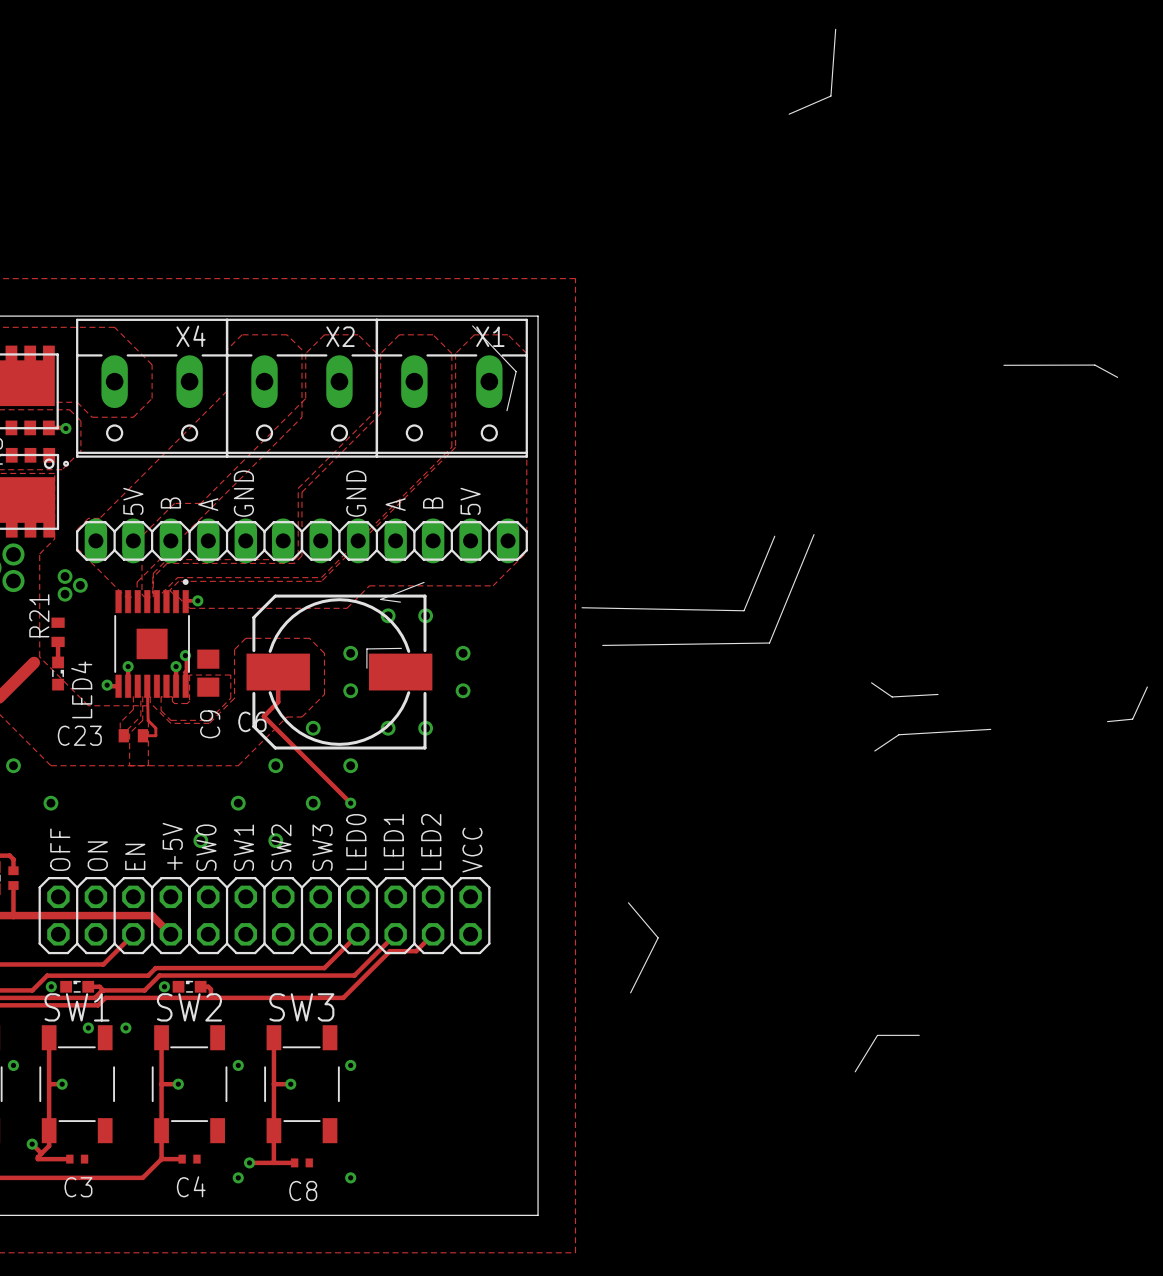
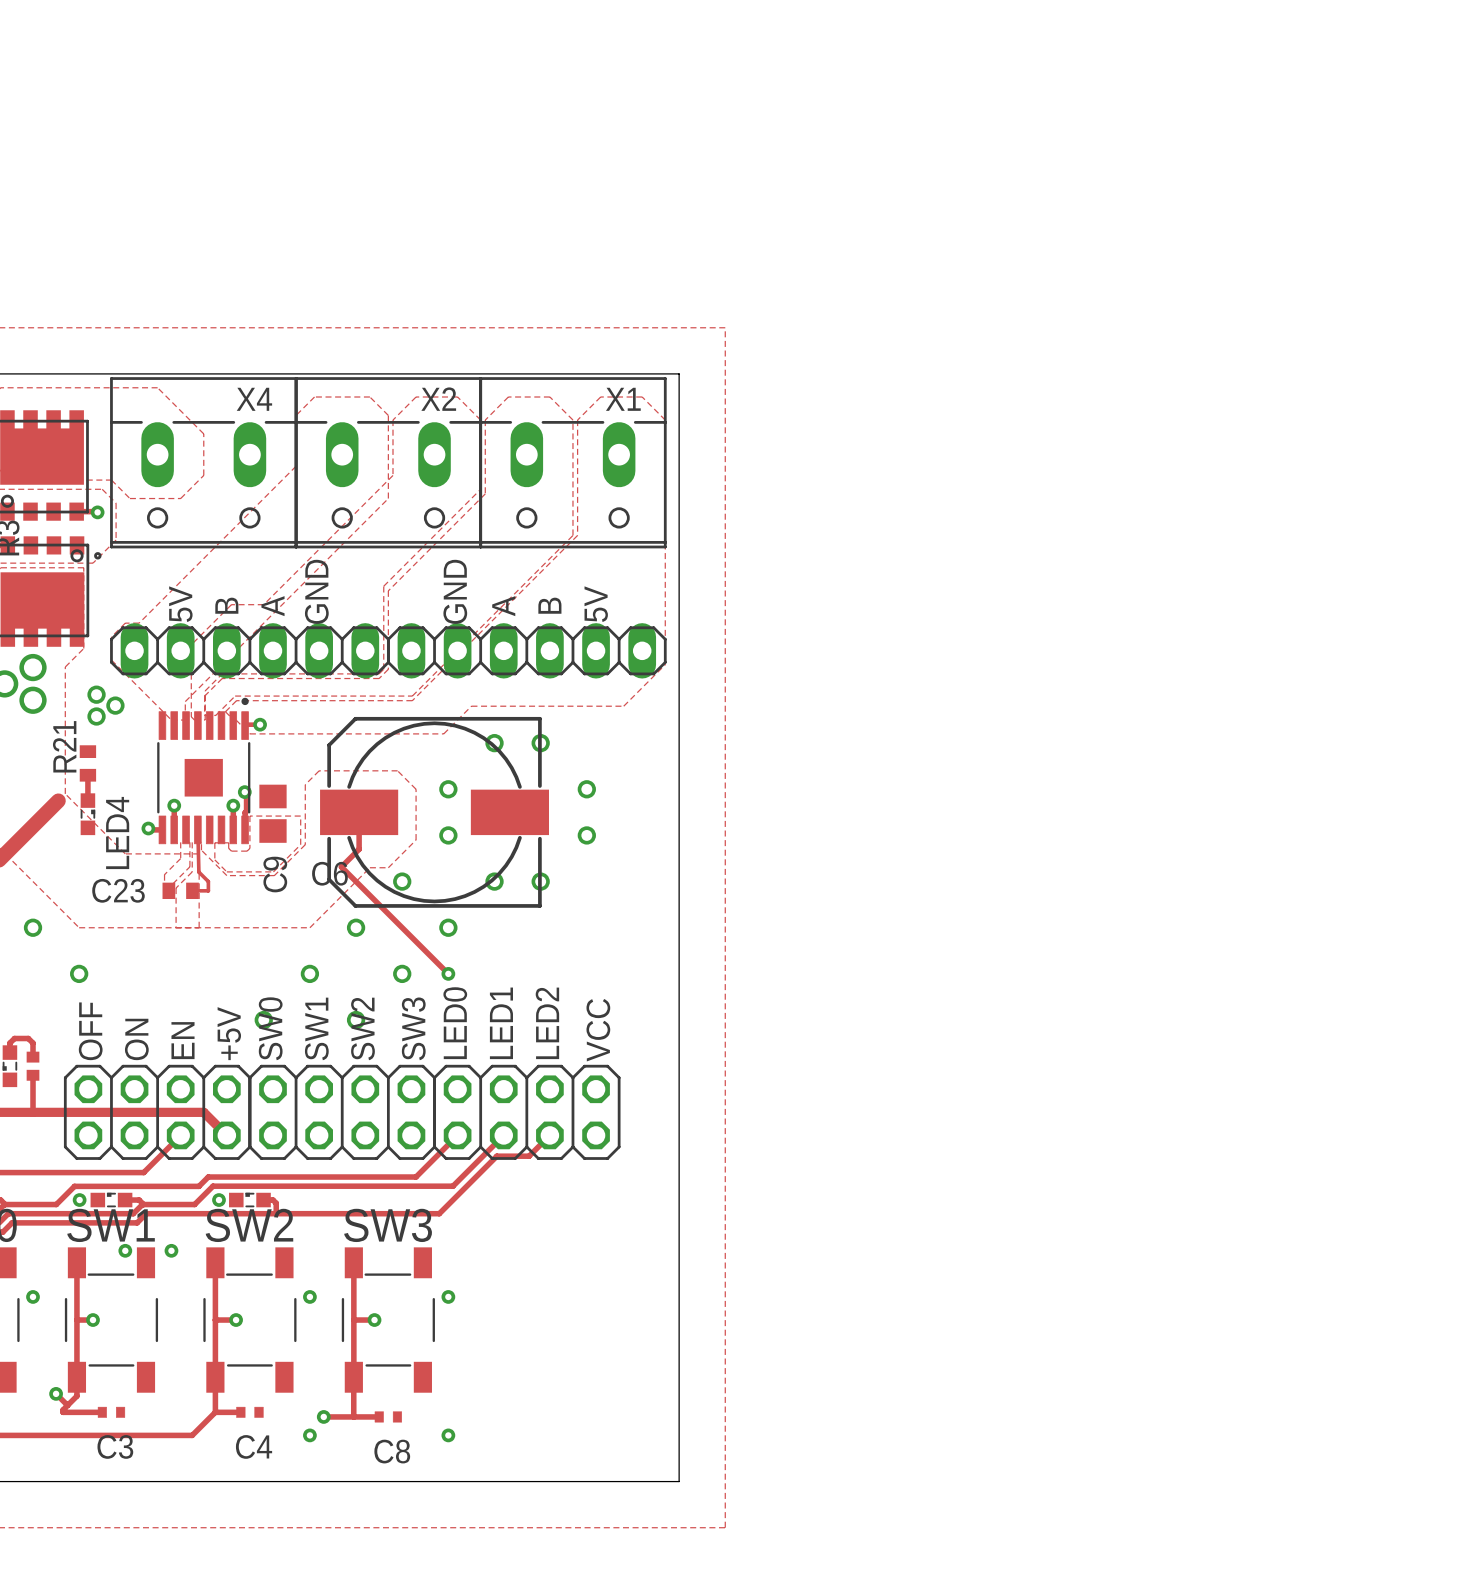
line: (835, 29) (830, 96) (789, 114) -> none
line: (472, 325) (516, 371) (506, 410) -> none
line: (1003, 365) (1094, 365) (1117, 377) -> none
line: (814, 534) (769, 643) (602, 645) -> none
line: (774, 536) (744, 610) (582, 607) -> none
line: (424, 582) (380, 599) (400, 602) -> none
line: (401, 648) (366, 648) (366, 668) -> none
line: (871, 682) (892, 696) (938, 694) -> none
line: (1147, 687) (1132, 719) (1107, 721) -> none
line: (990, 729) (898, 734) (874, 750) -> none
line: (628, 902) (658, 937) (630, 992) -> none
line: (919, 1035) (877, 1035) (855, 1071) -> none

